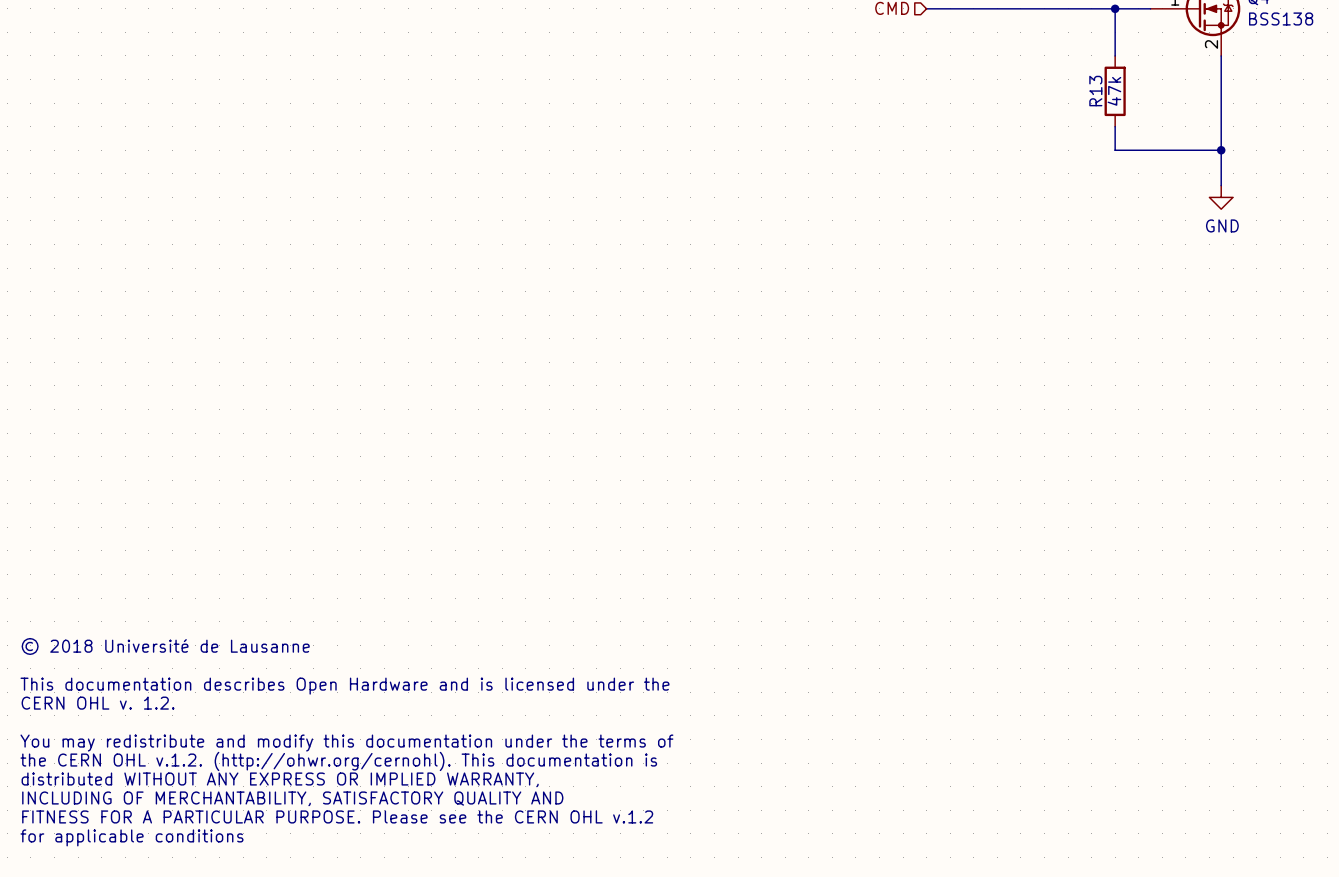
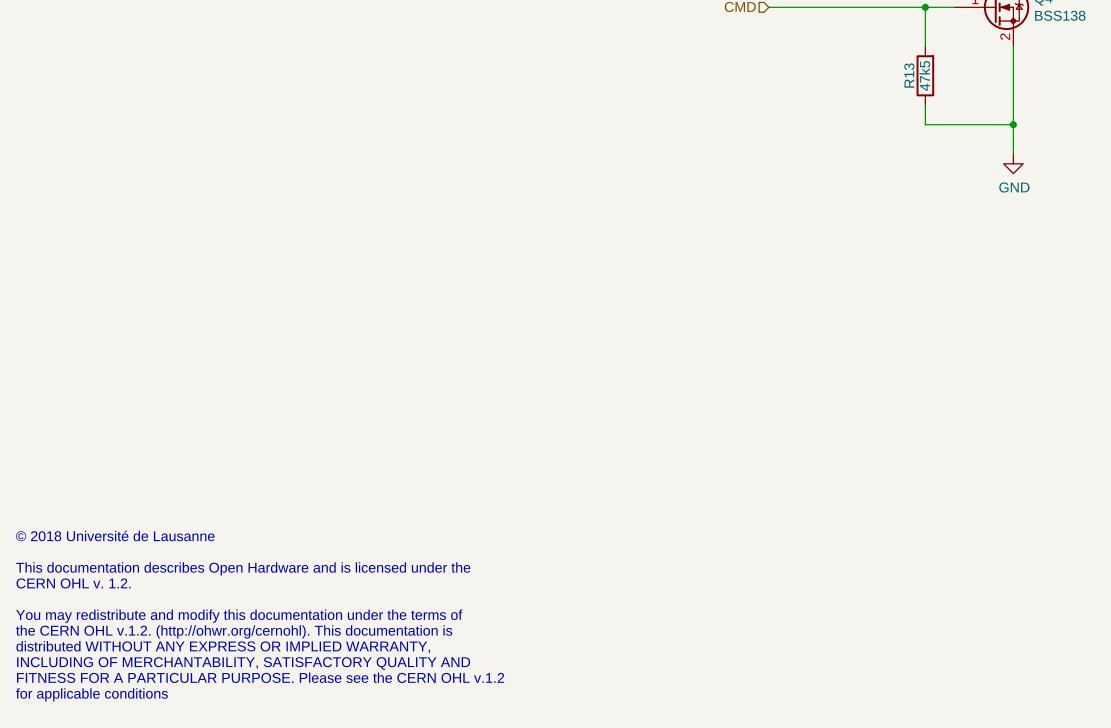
R13 value: 47k (1114, 91) -> 47k5 (924, 75)

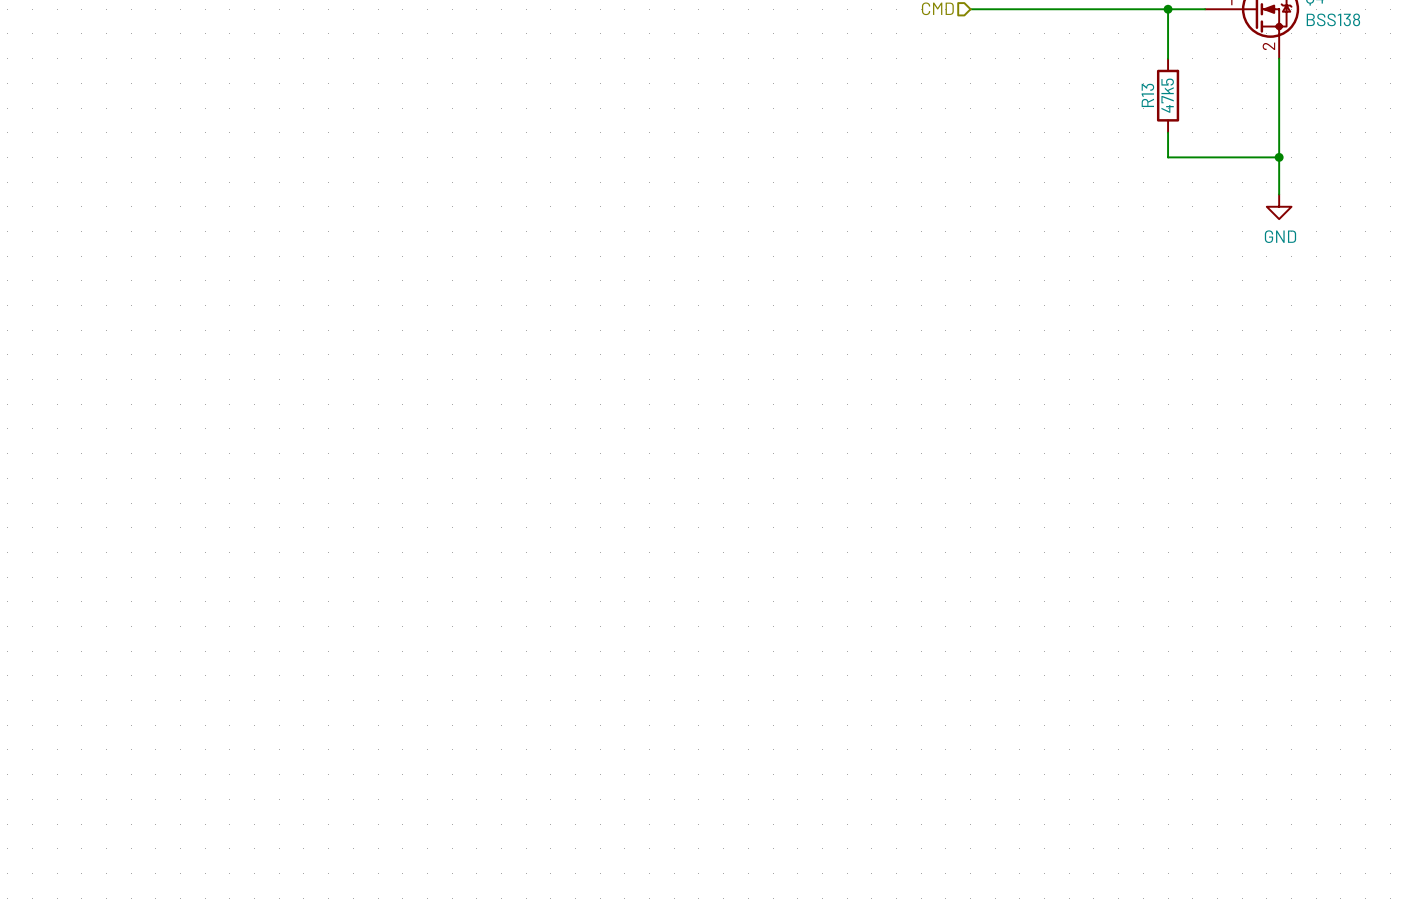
text: © 2018 Université de Lausanne (115, 535) -> none
text: This documentation describes Open Hardware and is licensed under the (243, 568) -> none
text: CERN OHL v. 1.2. (73, 583) -> none
text: You may redistribute and modify this documentation under the terms of (239, 616) -> none
text: the CERN OHL v.1.2. (http://ohwr.org/cernohl). This documentation is (234, 631) -> none
text: distributed WITHOUT ANY EXPRESS OR IMPLIED WARRANTY, (223, 647) -> none
text: INCLUDING OF MERCHANTABILITY, SATISFACTORY QUALITY AND (243, 663) -> none
text: FITNESS FOR A PARTICULAR PURPOSE. Please see the CERN OHL v.1.2 (260, 677) -> none
text: for applicable conditions (91, 694) -> none

